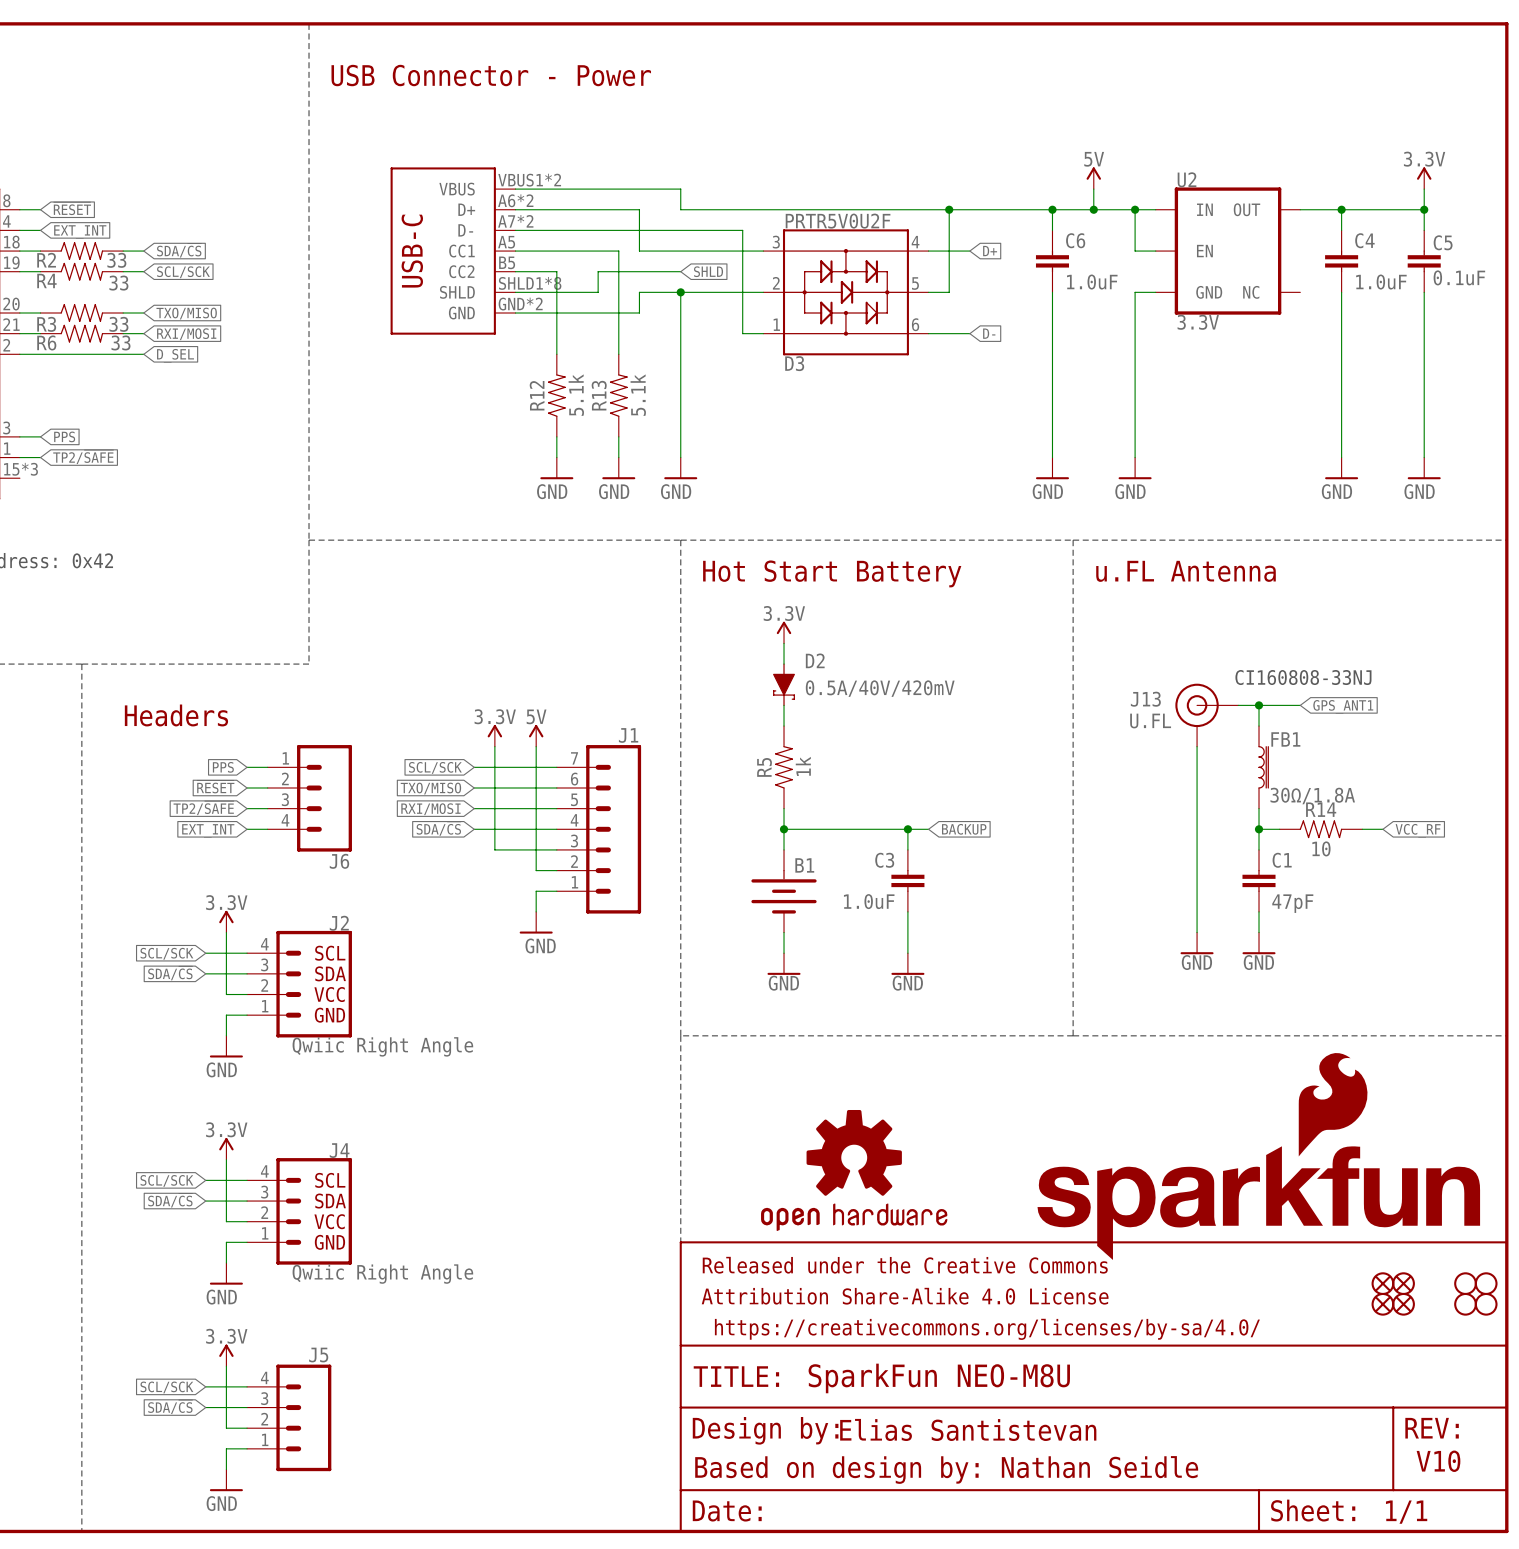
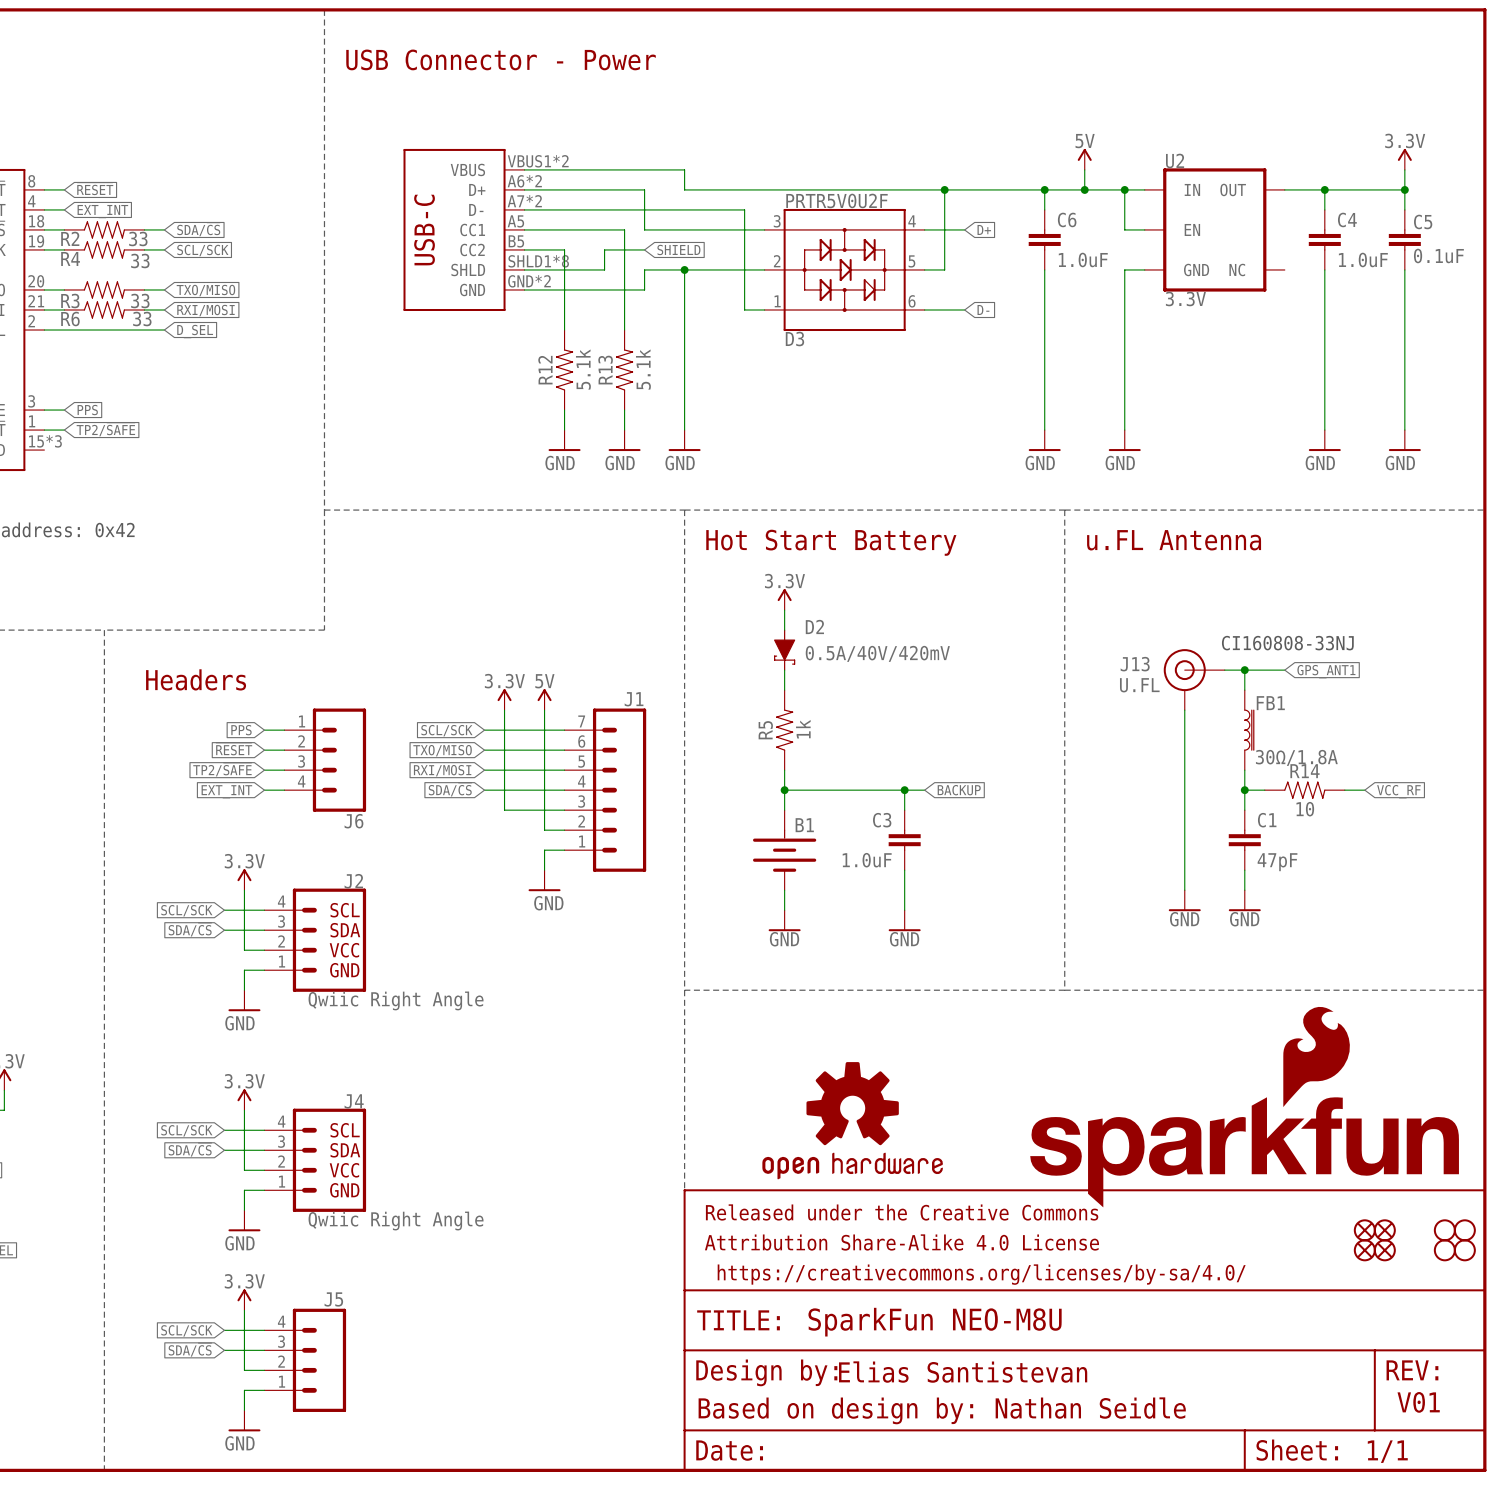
wire: (639, 271) (680, 271) -> none
global label: SHLD (708, 271) -> SHIELD (678, 249)
text: V10 (1438, 1461) -> V01 (1418, 1402)

